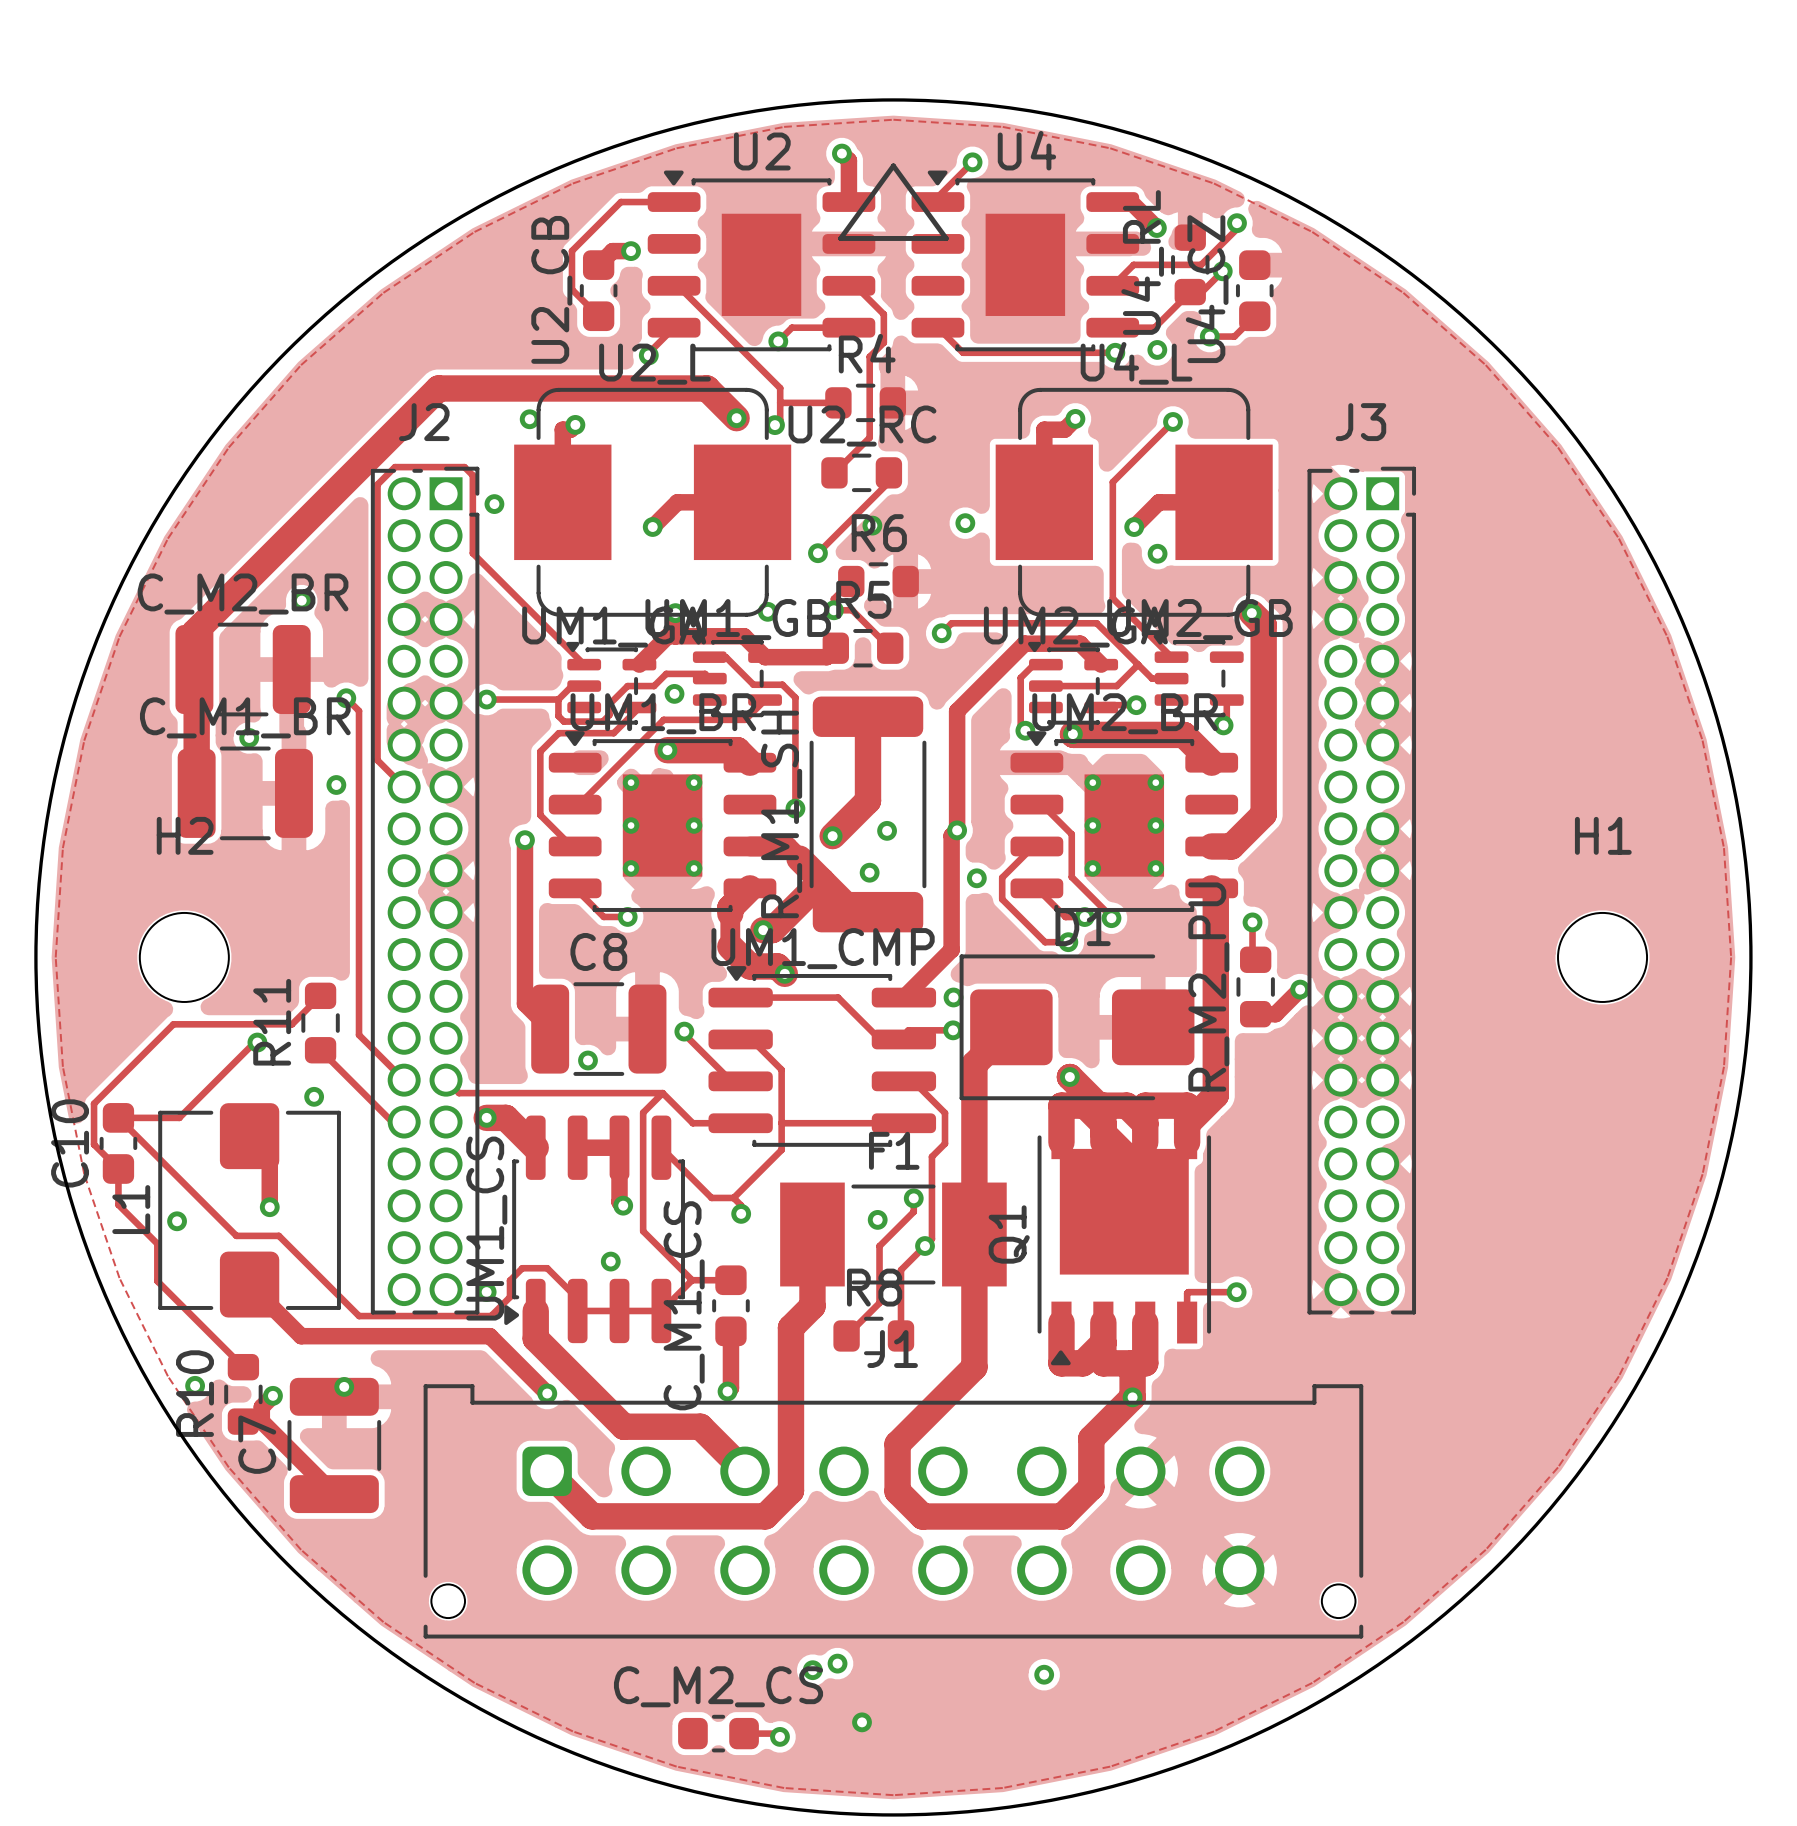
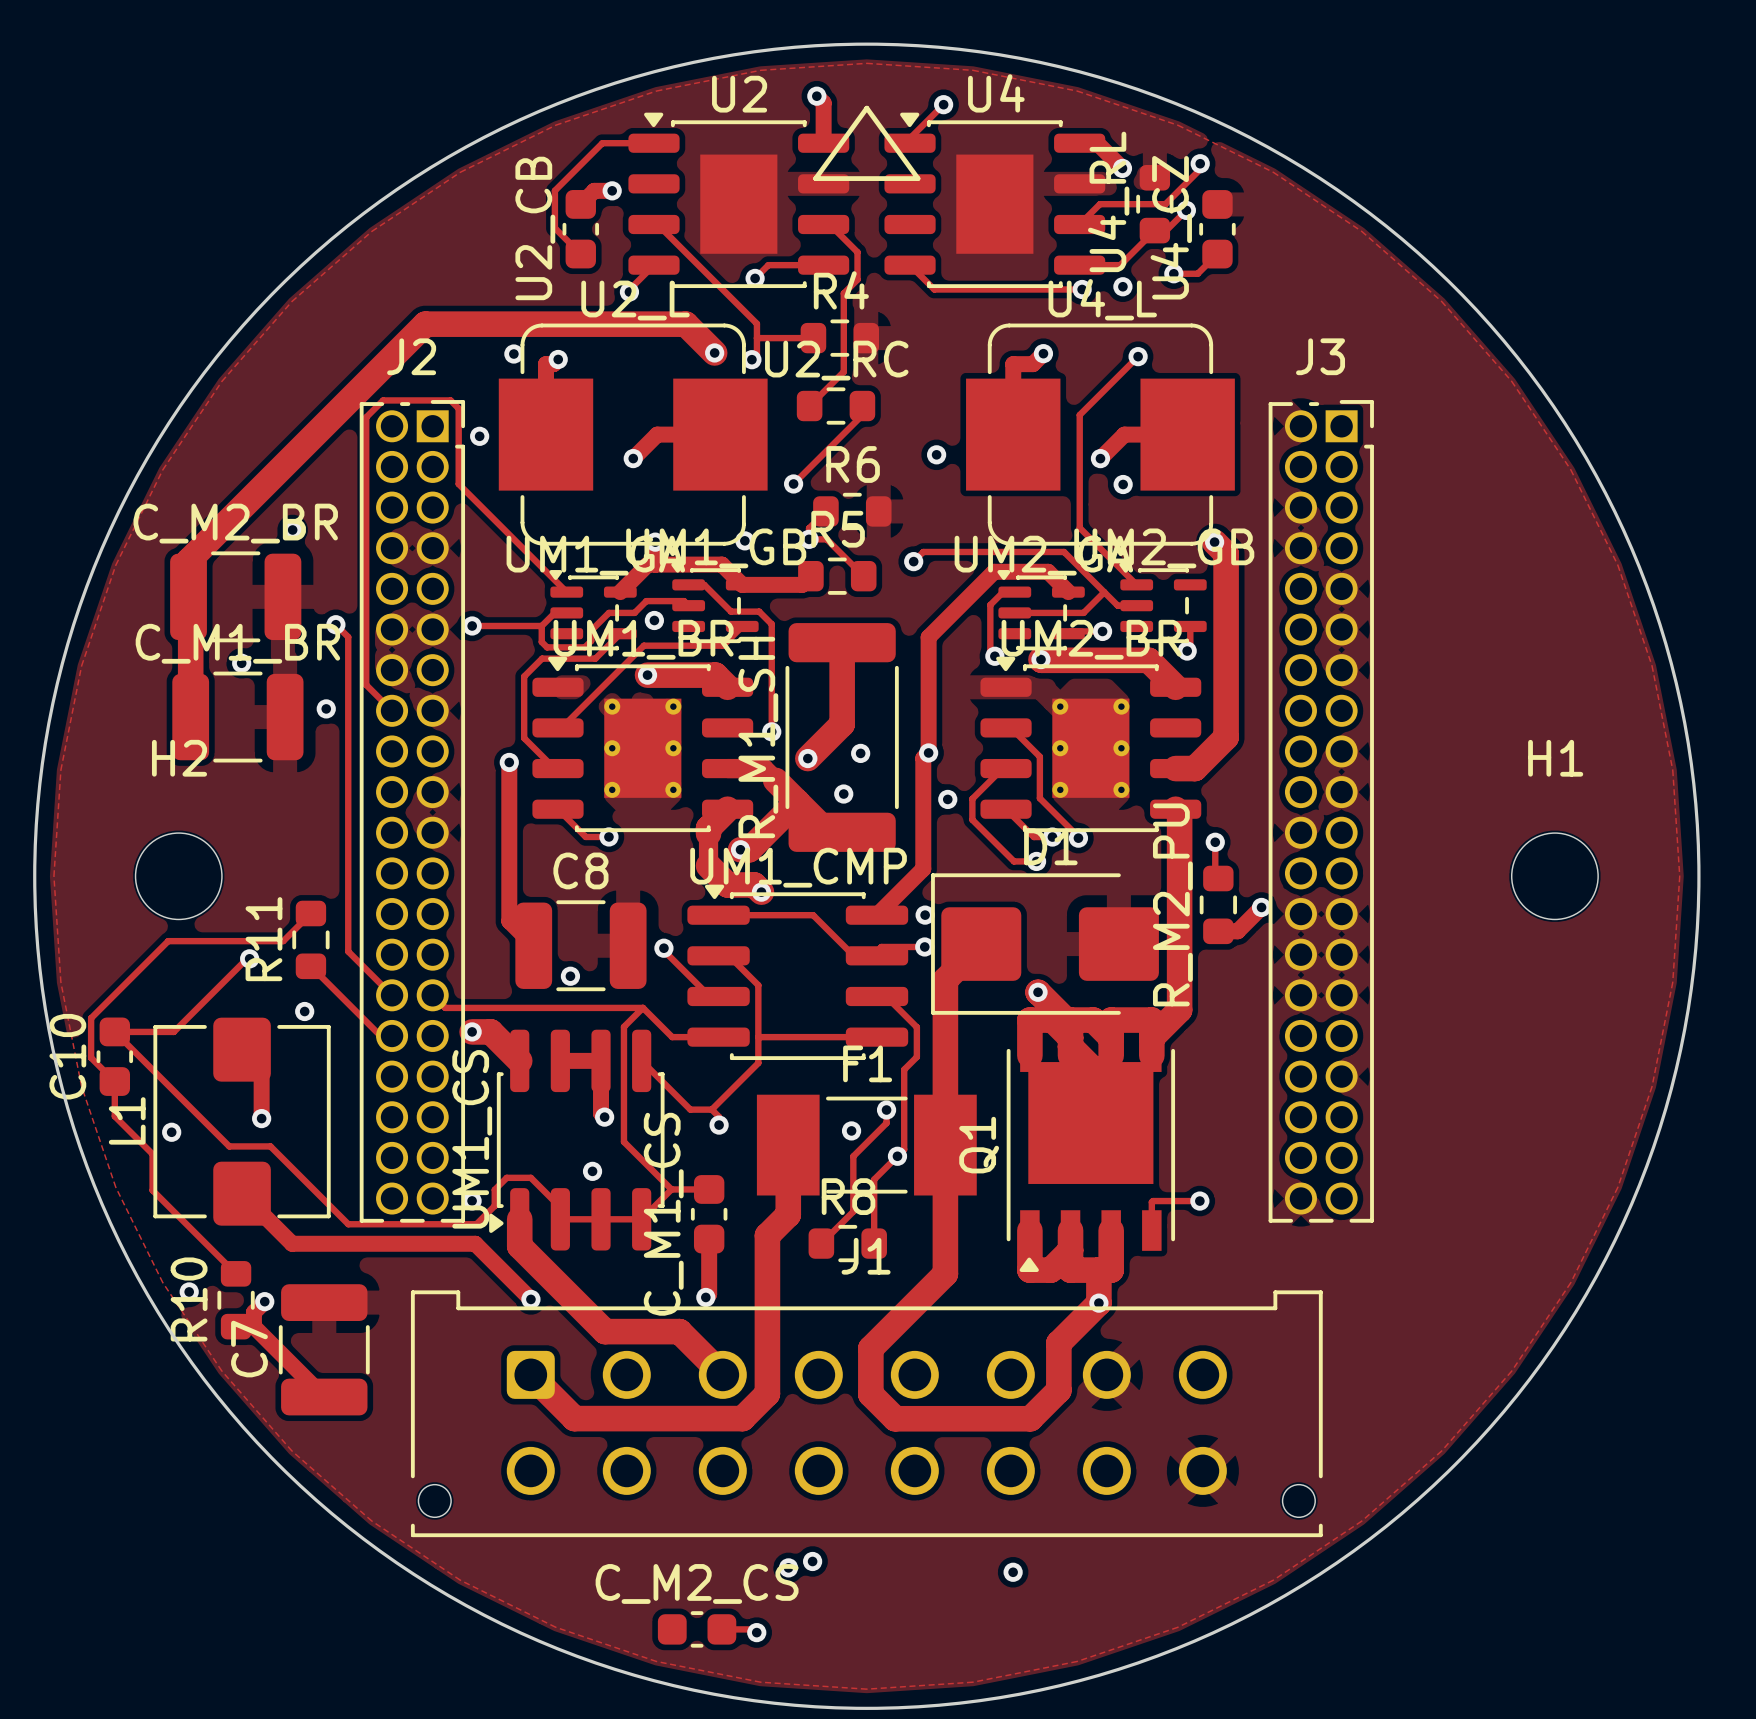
via: (872, 525) -> none
via: (344, 1386) -> none
via: (862, 1722) -> none

